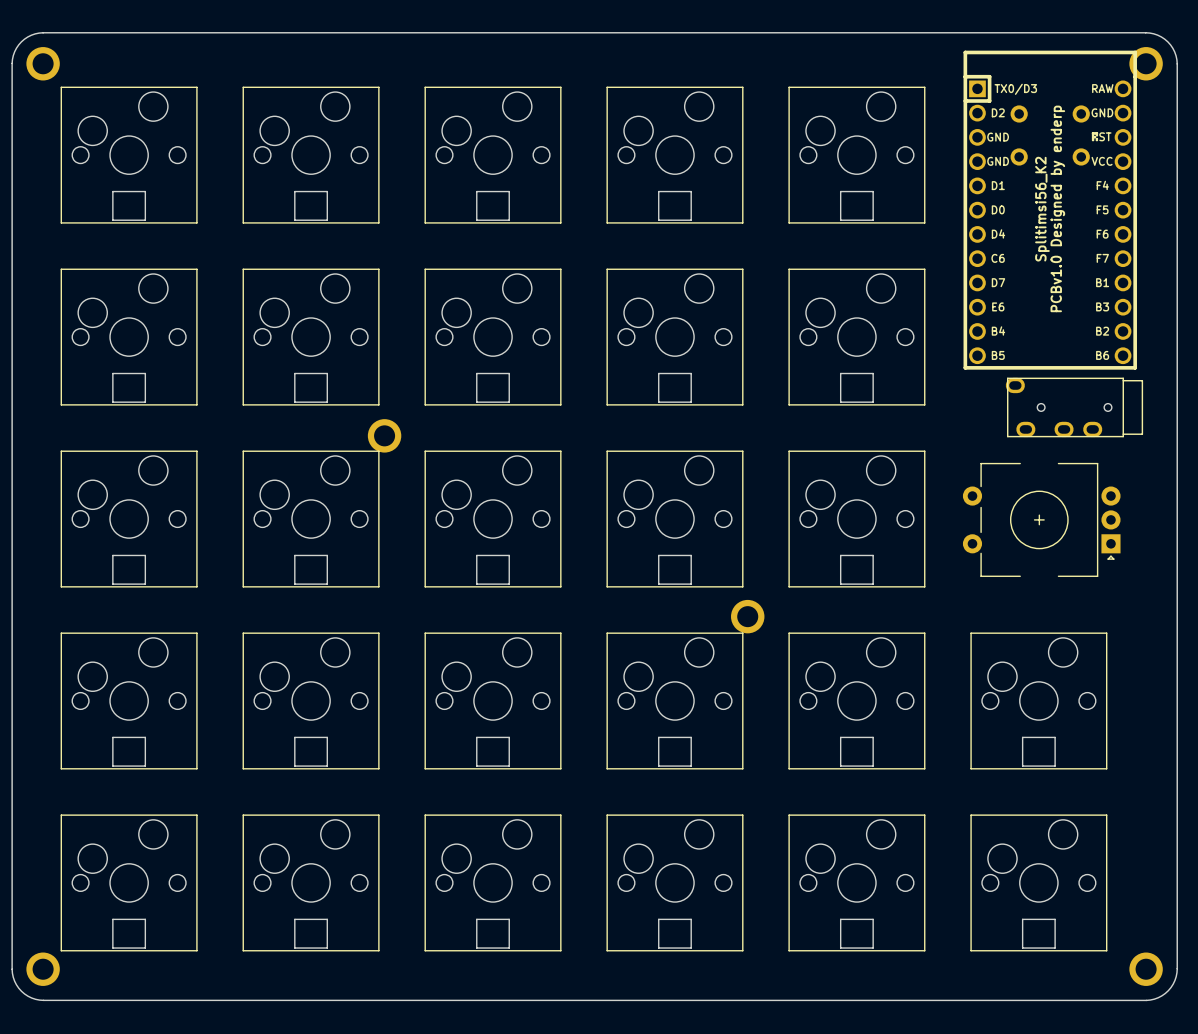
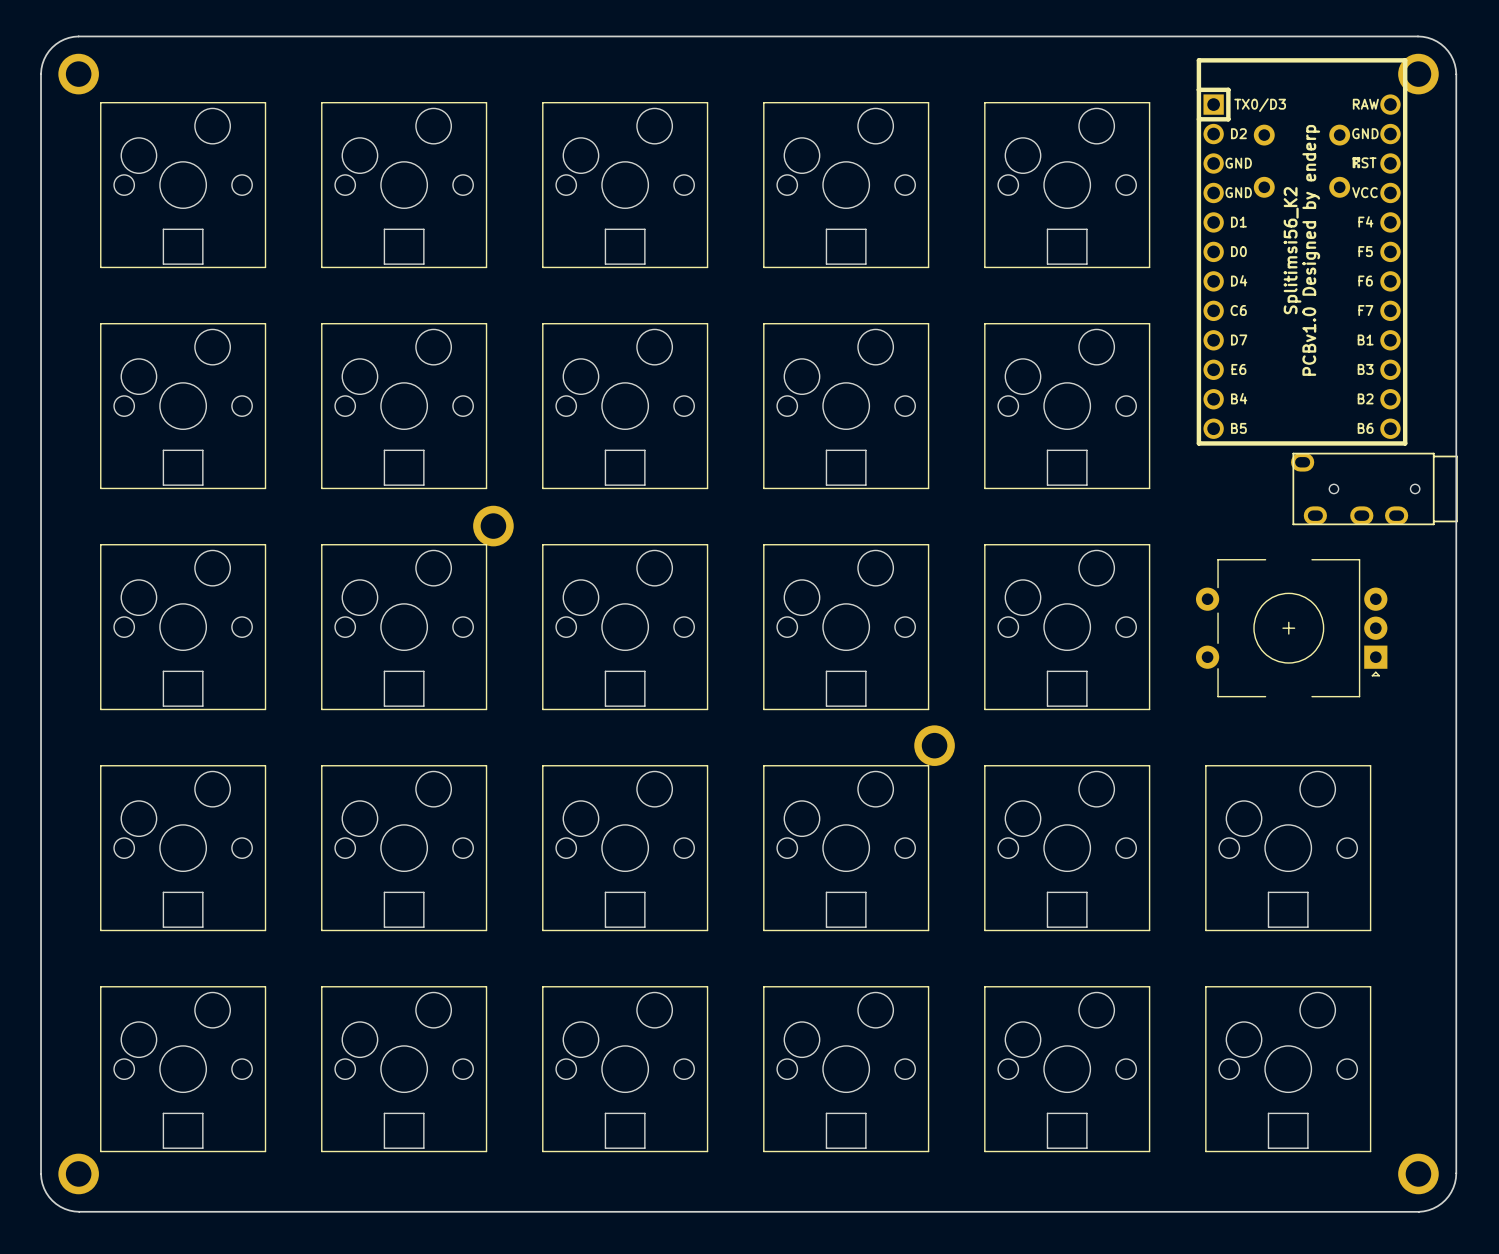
part position: (1074, 407) -> (1374, 488)

